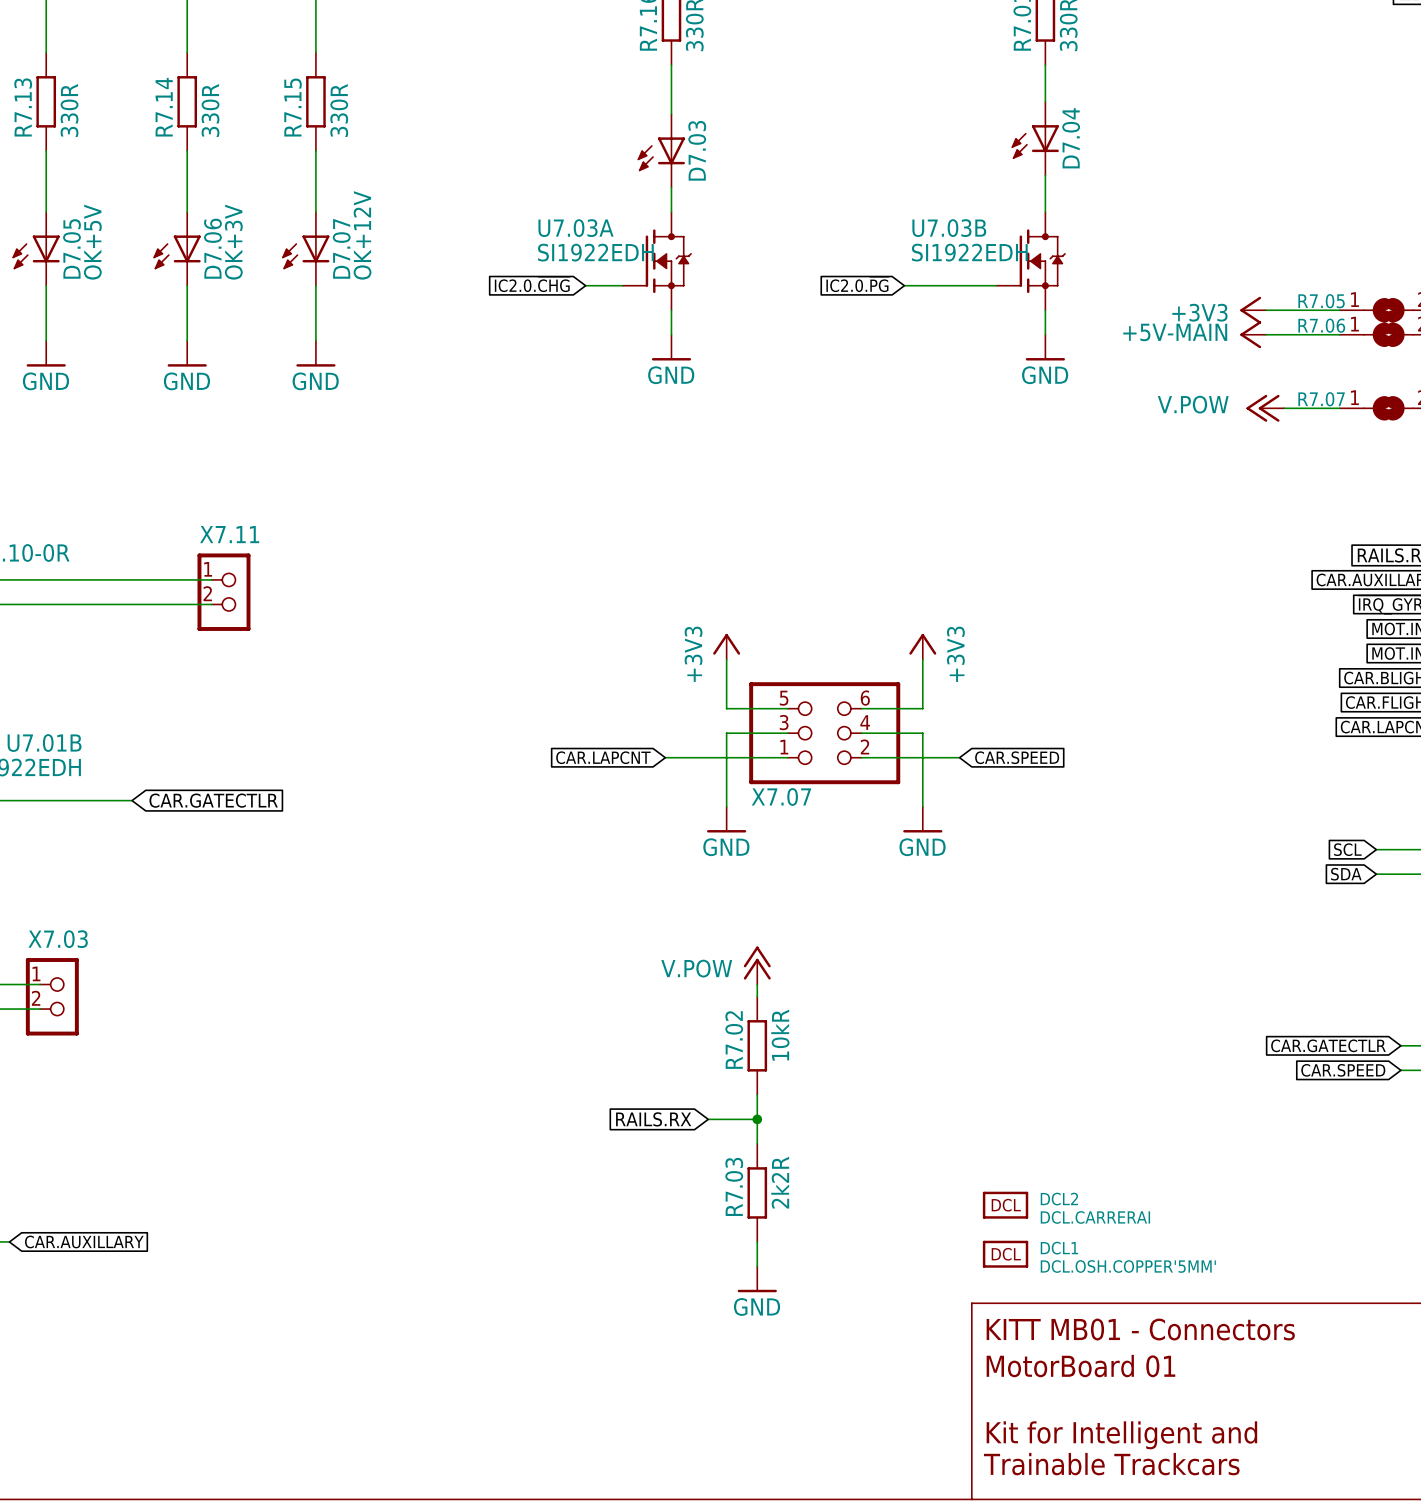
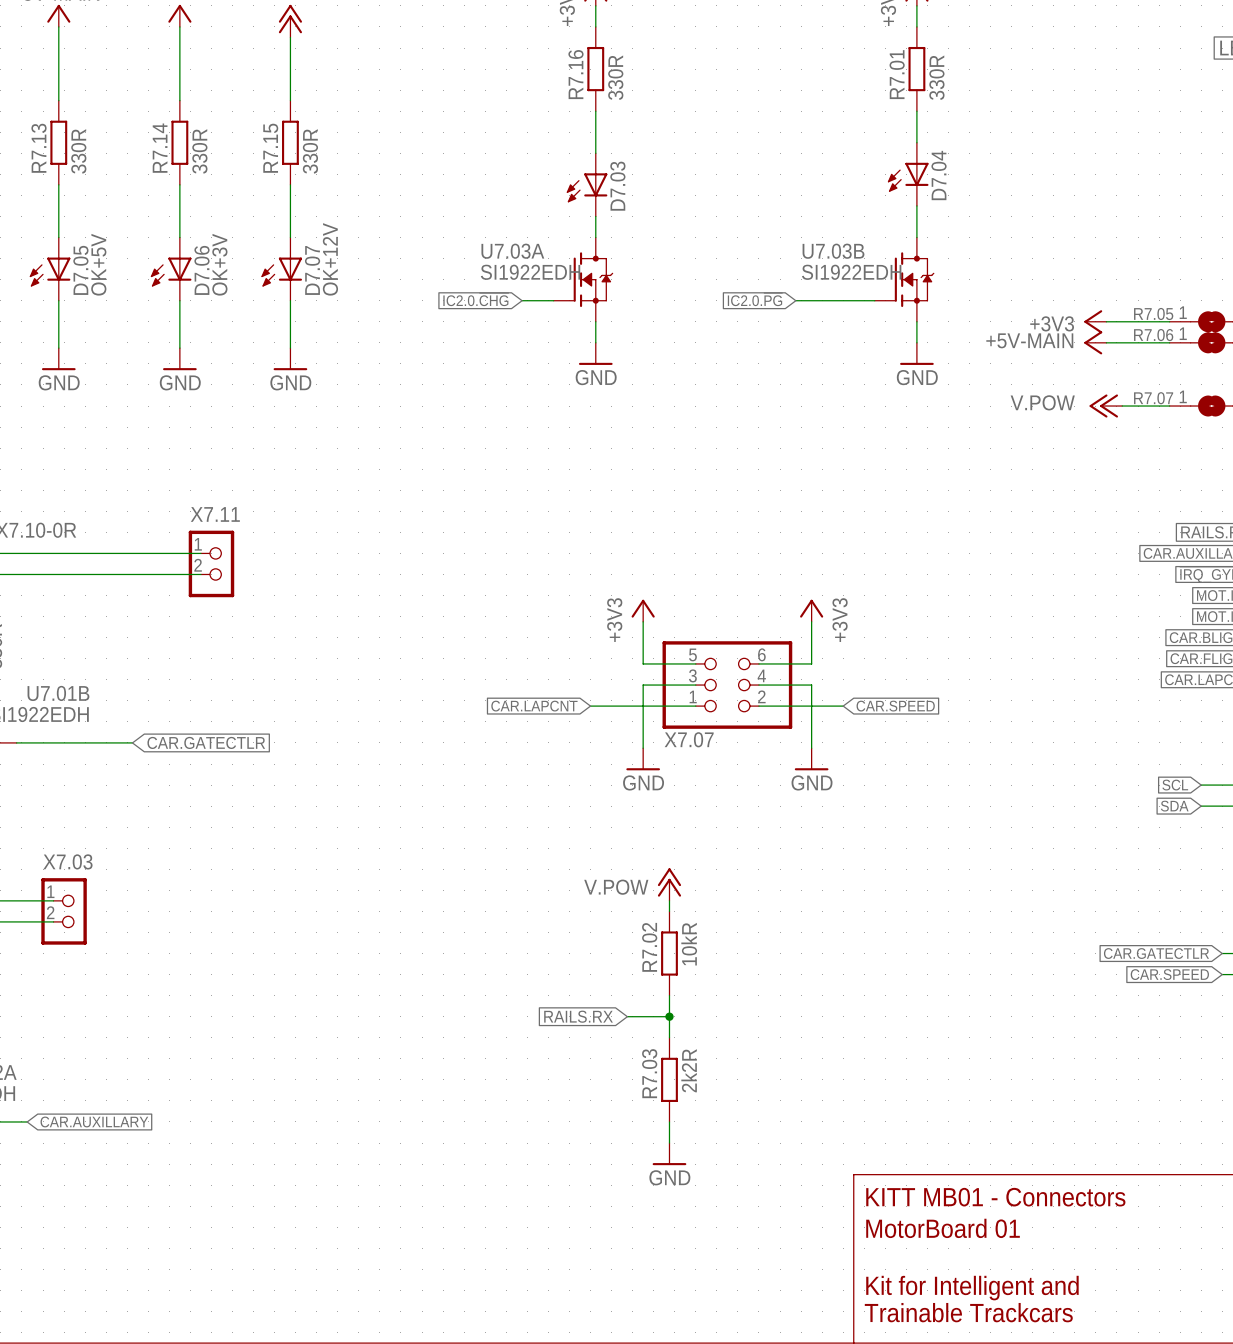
DCL2: DCL.CARRERAI (1005, 1205) -> none
DCL1: DCL.OSH.COPPER'5MM' (1005, 1254) -> none

